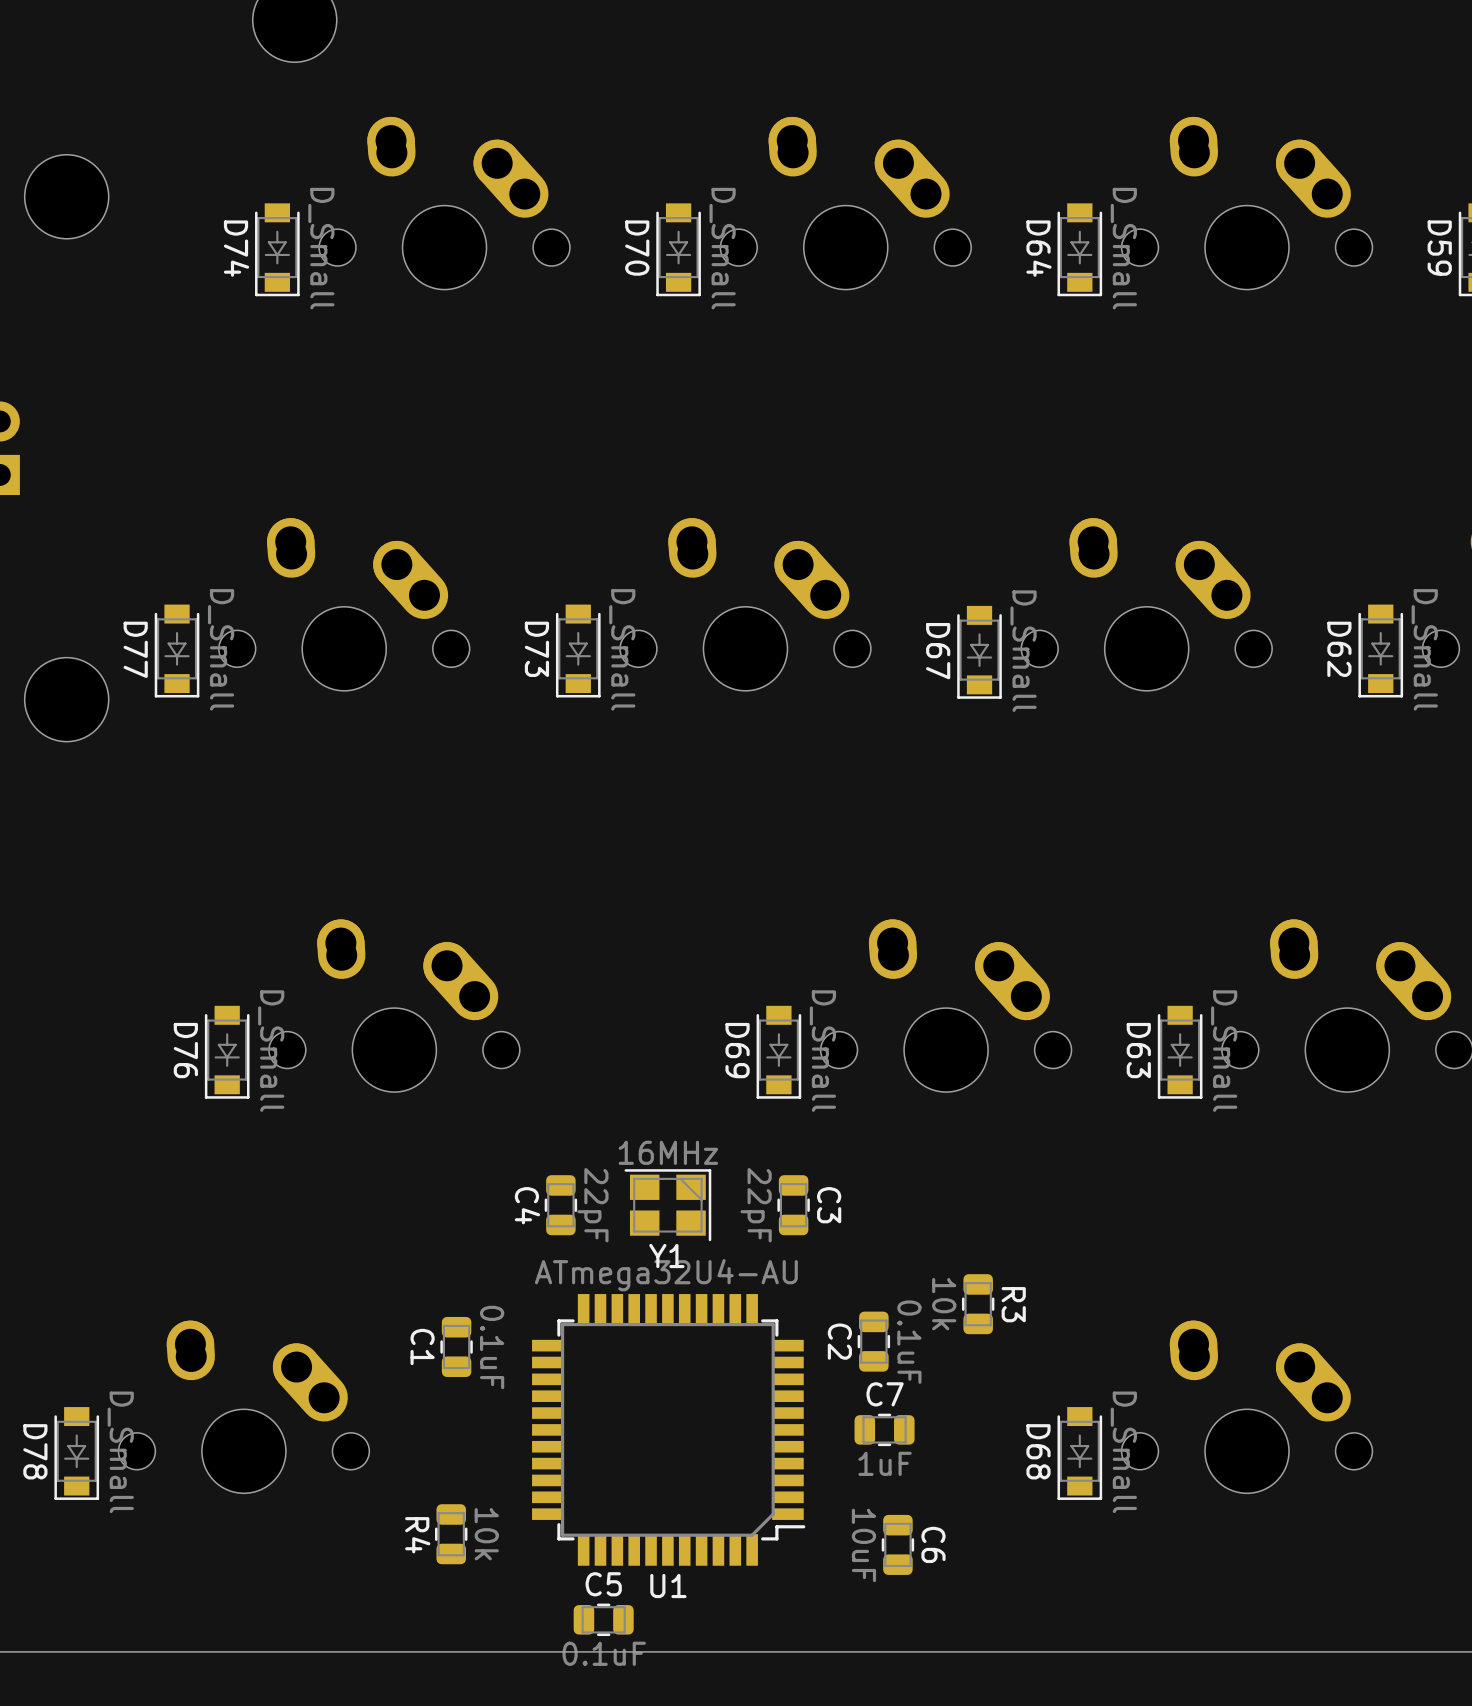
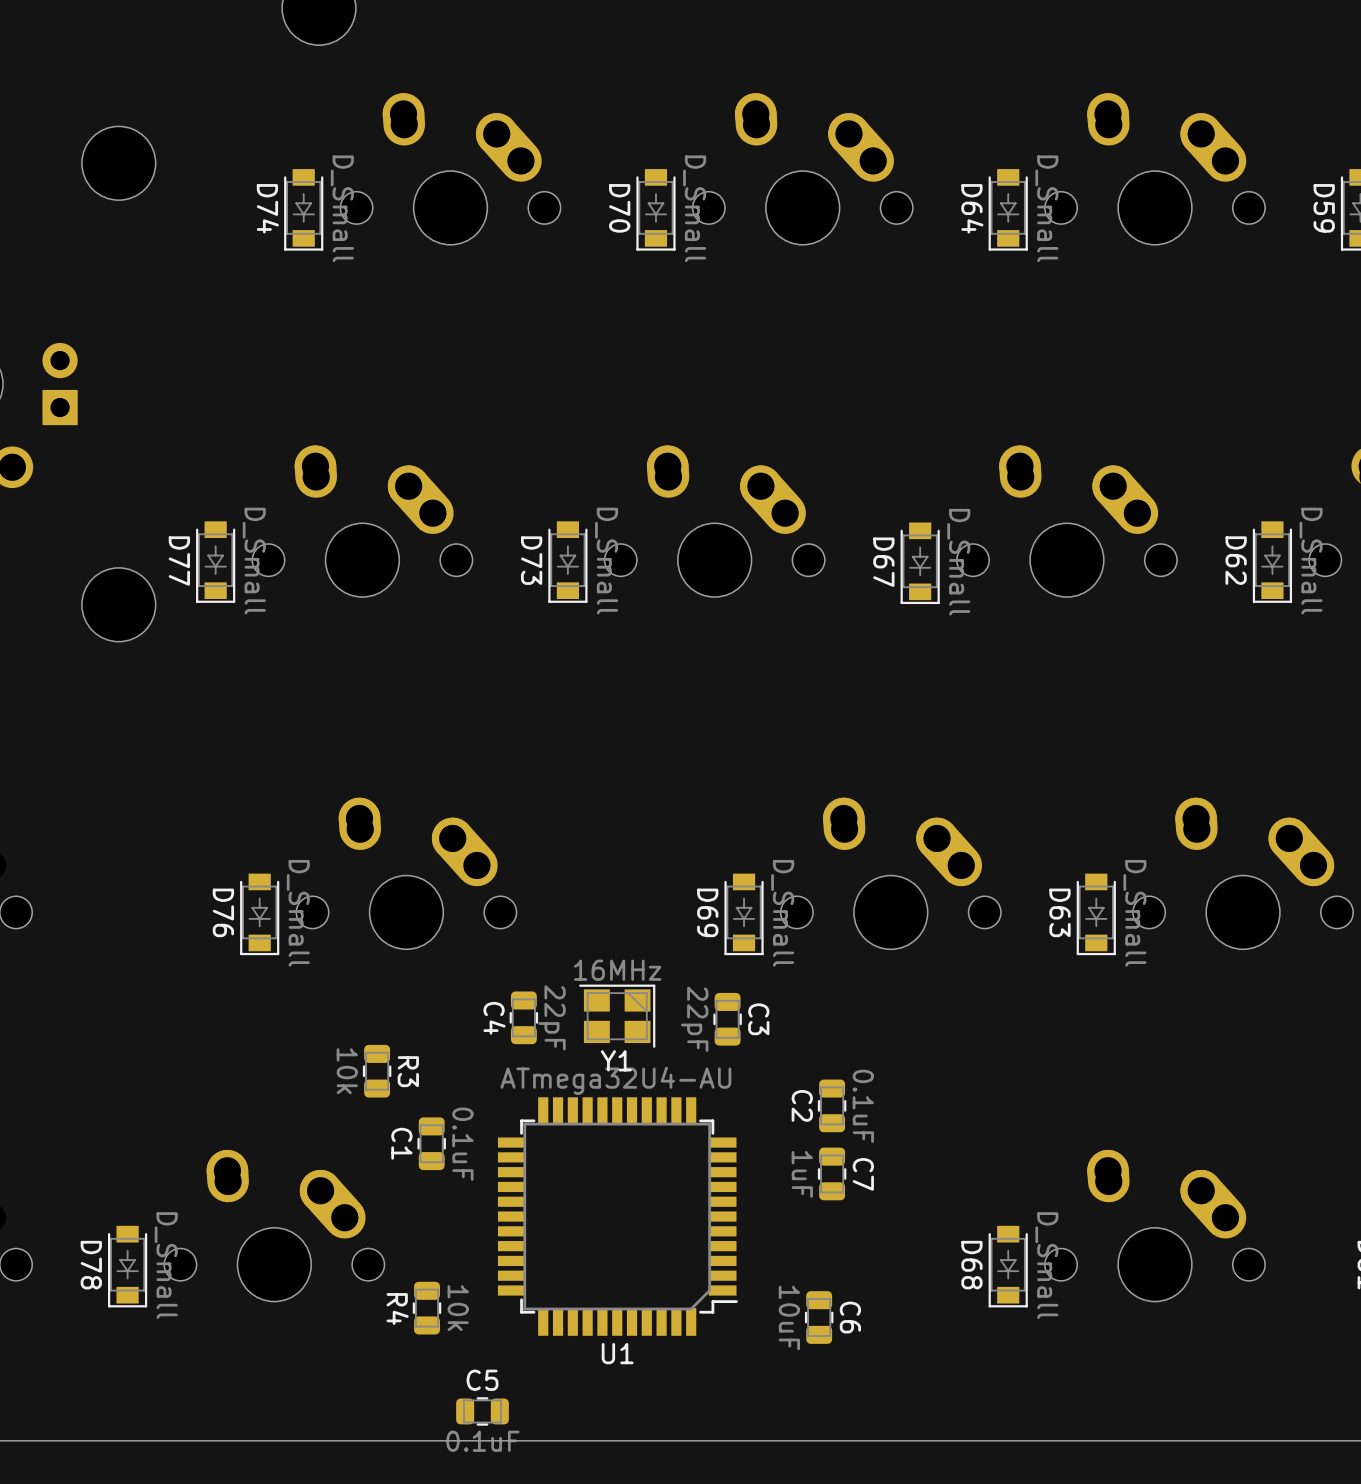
C4 position: (560, 1205) -> (523, 1017)
Y1 position: (667, 1205) -> (617, 1016)
C3 position: (793, 1205) -> (727, 1019)
R3 position: (978, 1304) -> (377, 1071)
C2 position: (873, 1341) -> (832, 1105)
C1 position: (456, 1346) -> (431, 1143)
U1 position: (668, 1429) -> (617, 1216)
C7 rotation: 0° (884, 1429) -> 90° clockwise (832, 1173)
C7 position: (884, 1429) -> (832, 1173)
R4 position: (451, 1534) -> (427, 1308)
C6 position: (897, 1544) -> (819, 1317)
C5 position: (603, 1619) -> (482, 1411)

